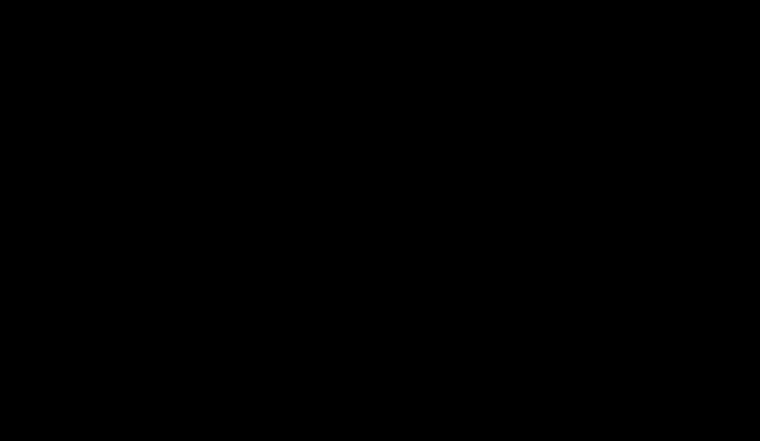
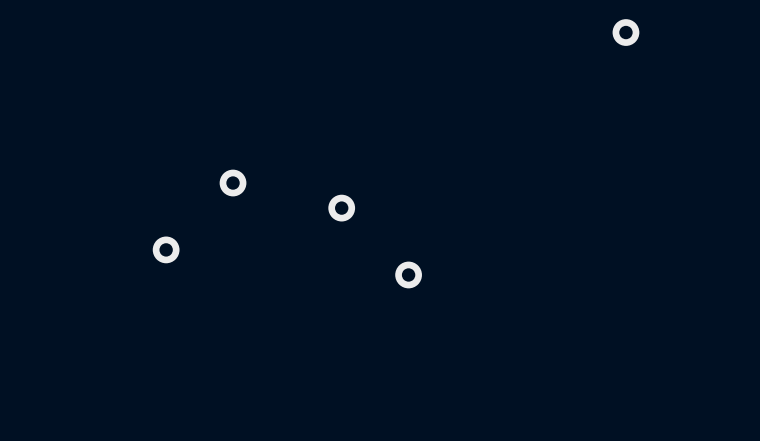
via: none -> (625, 32)
via: none -> (233, 183)
via: none -> (341, 208)
via: none -> (166, 249)
via: none -> (408, 274)

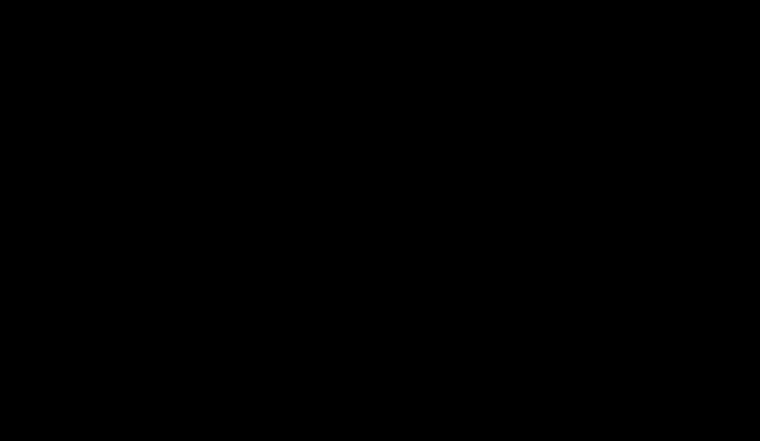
via: (625, 32) -> none
via: (233, 183) -> none
via: (341, 208) -> none
via: (166, 249) -> none
via: (408, 274) -> none

